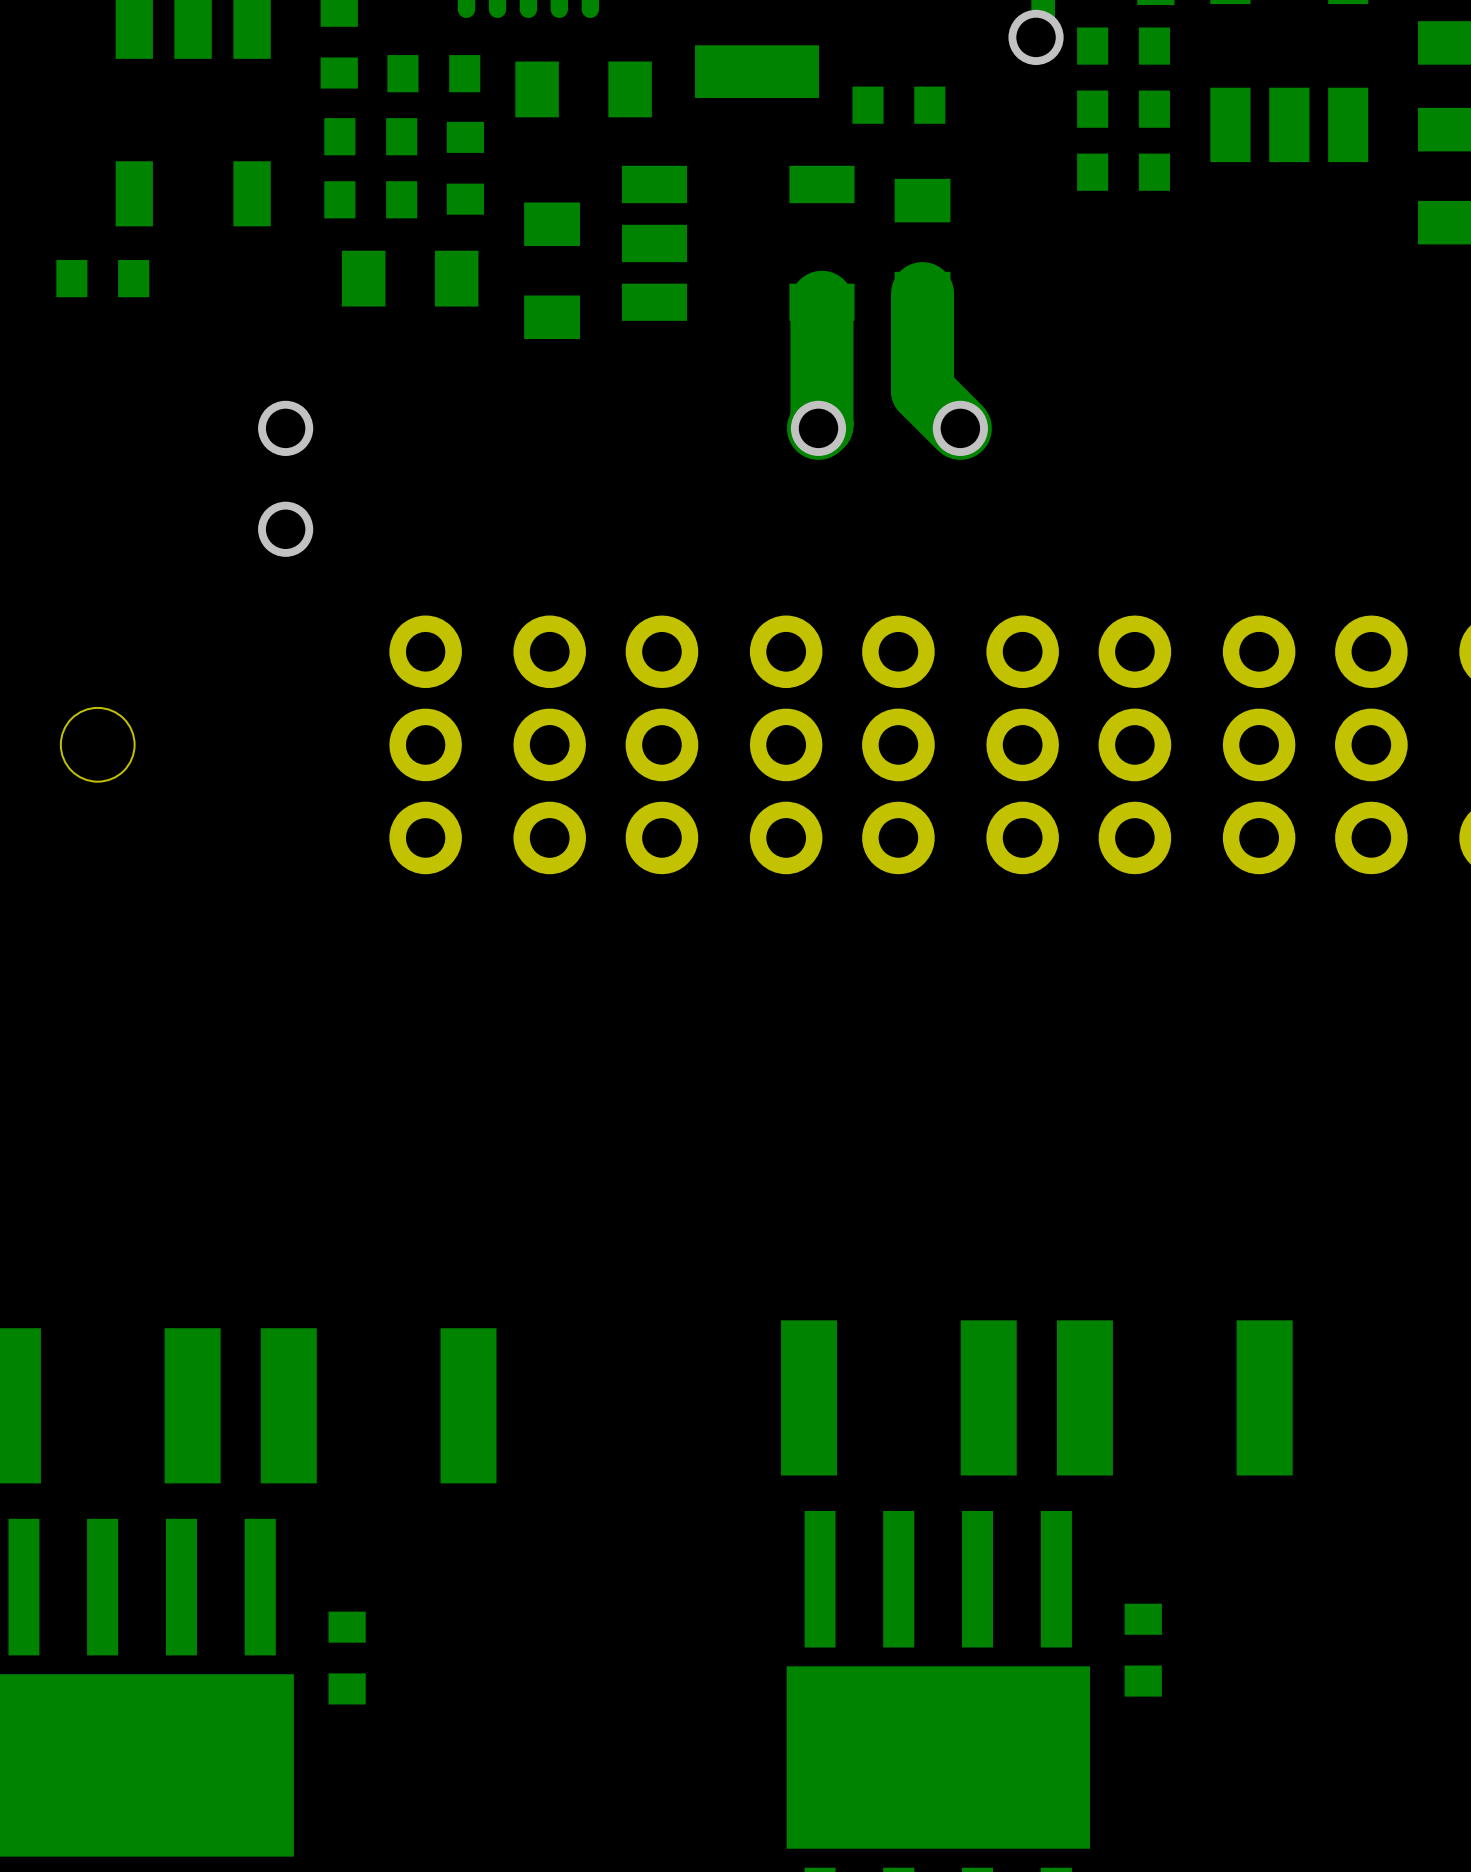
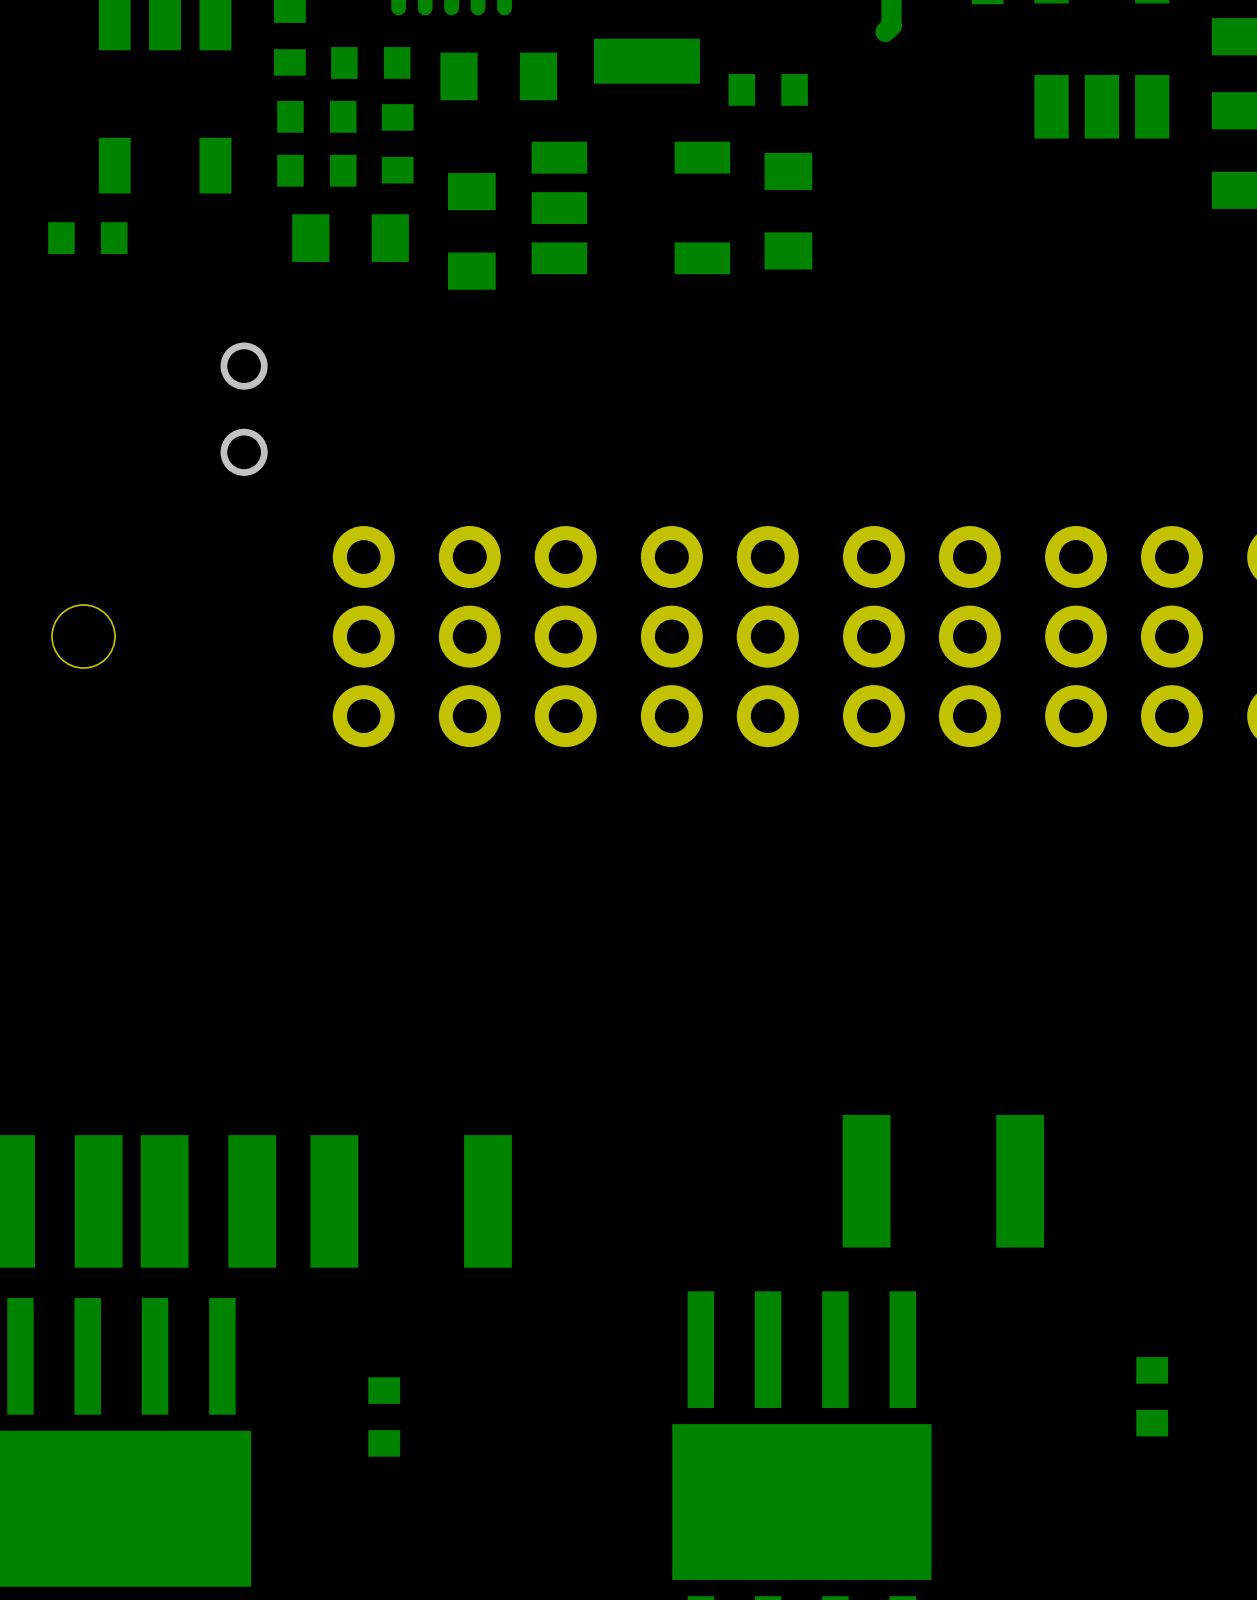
via: (1036, 37) -> none
part: (1123, 46) -> none
part: (1123, 109) -> none
part: (1123, 172) -> none
bottom track: (922, 293) (922, 390) (960, 428) -> none
bottom track: (821, 302) (821, 424) (818, 428) -> none
via: (818, 428) -> none
via: (960, 428) -> none
part: (898, 1397) -> none
part position: (1174, 1397) -> (943, 1181)
part: none -> (175, 1201)
part: (378, 1405) -> none
part: none -> (411, 1201)
part position: (1143, 1650) -> (1152, 1396)
part position: (347, 1658) -> (384, 1416)

